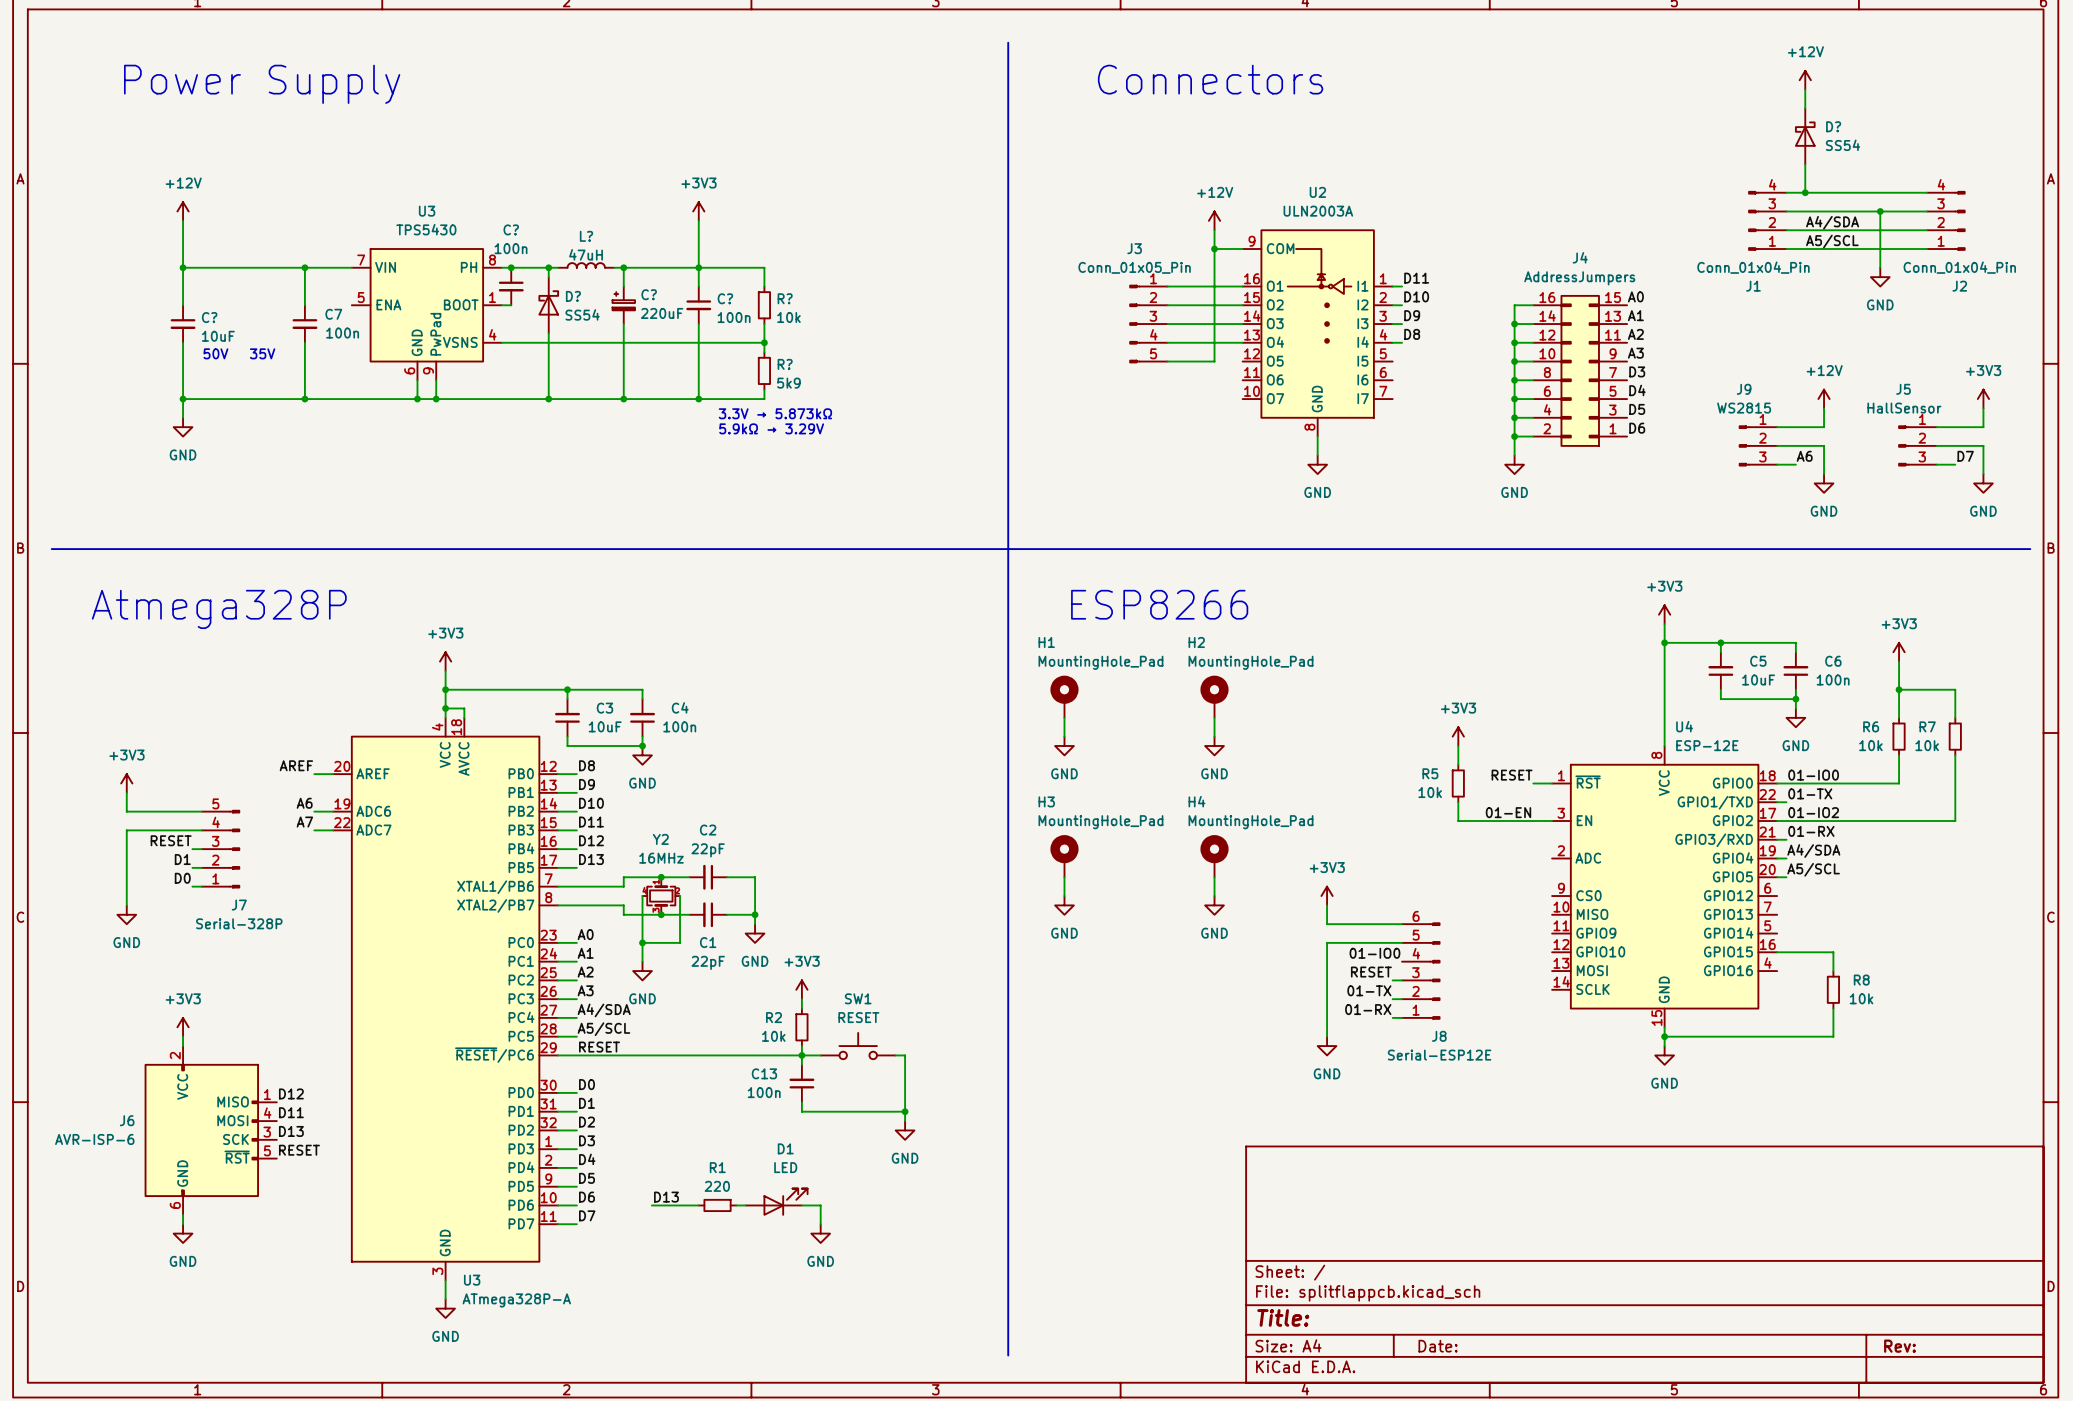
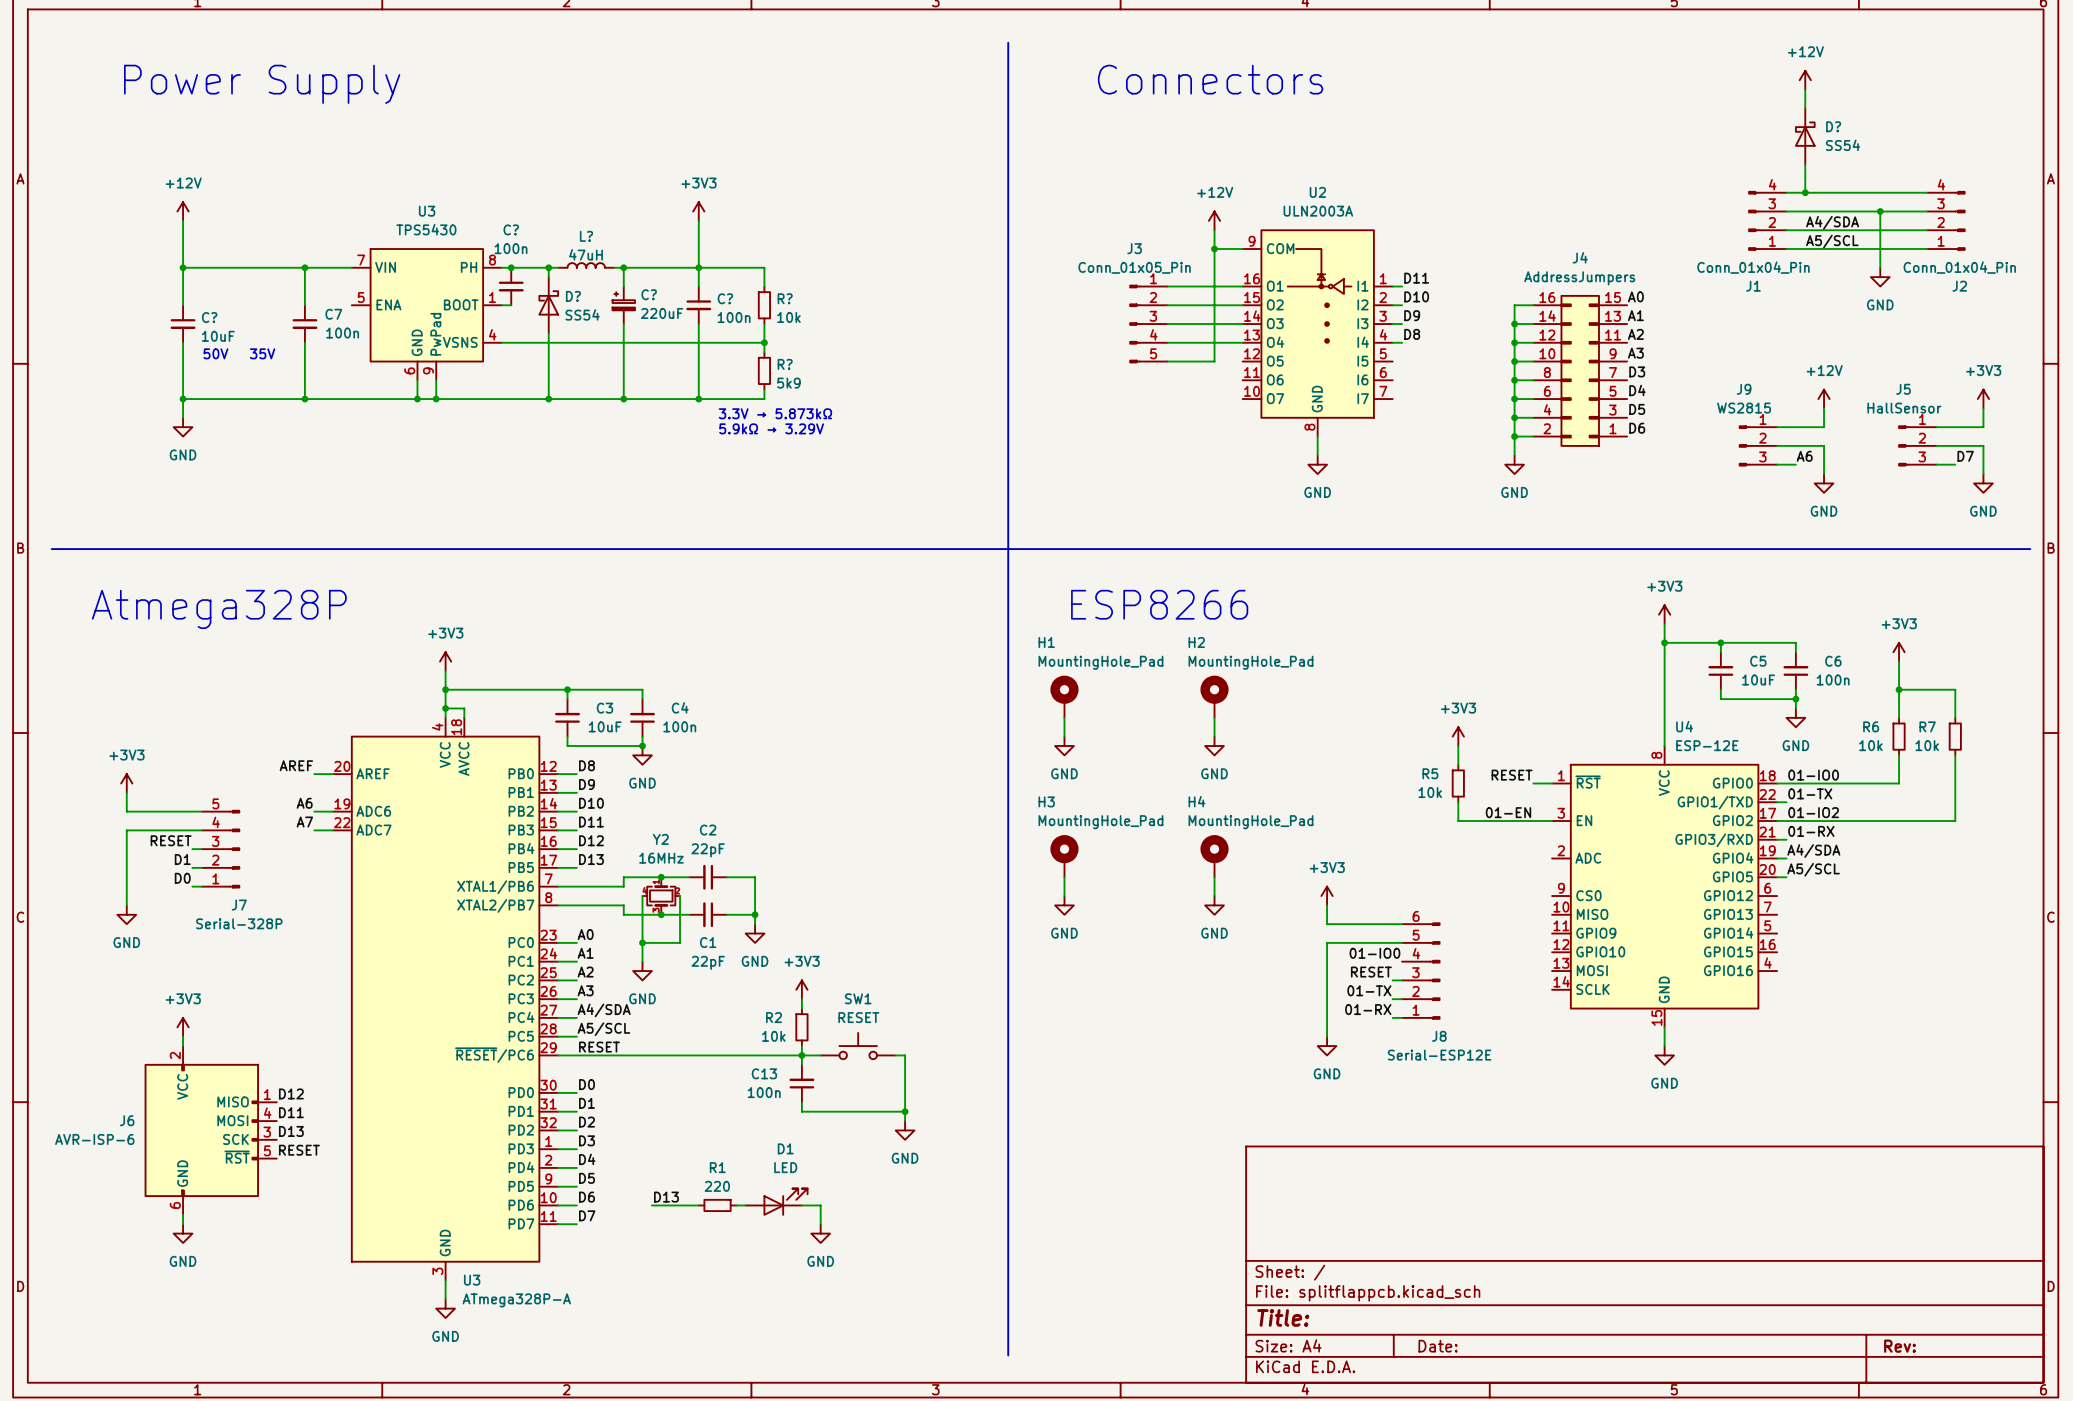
wire: (1777, 952) (1833, 952) (1833, 971) -> none
R8: 10k (1833, 989) -> none
wire: (1833, 1008) (1833, 1036) (1664, 1036) -> none
junction: (1664, 1036) -> none

